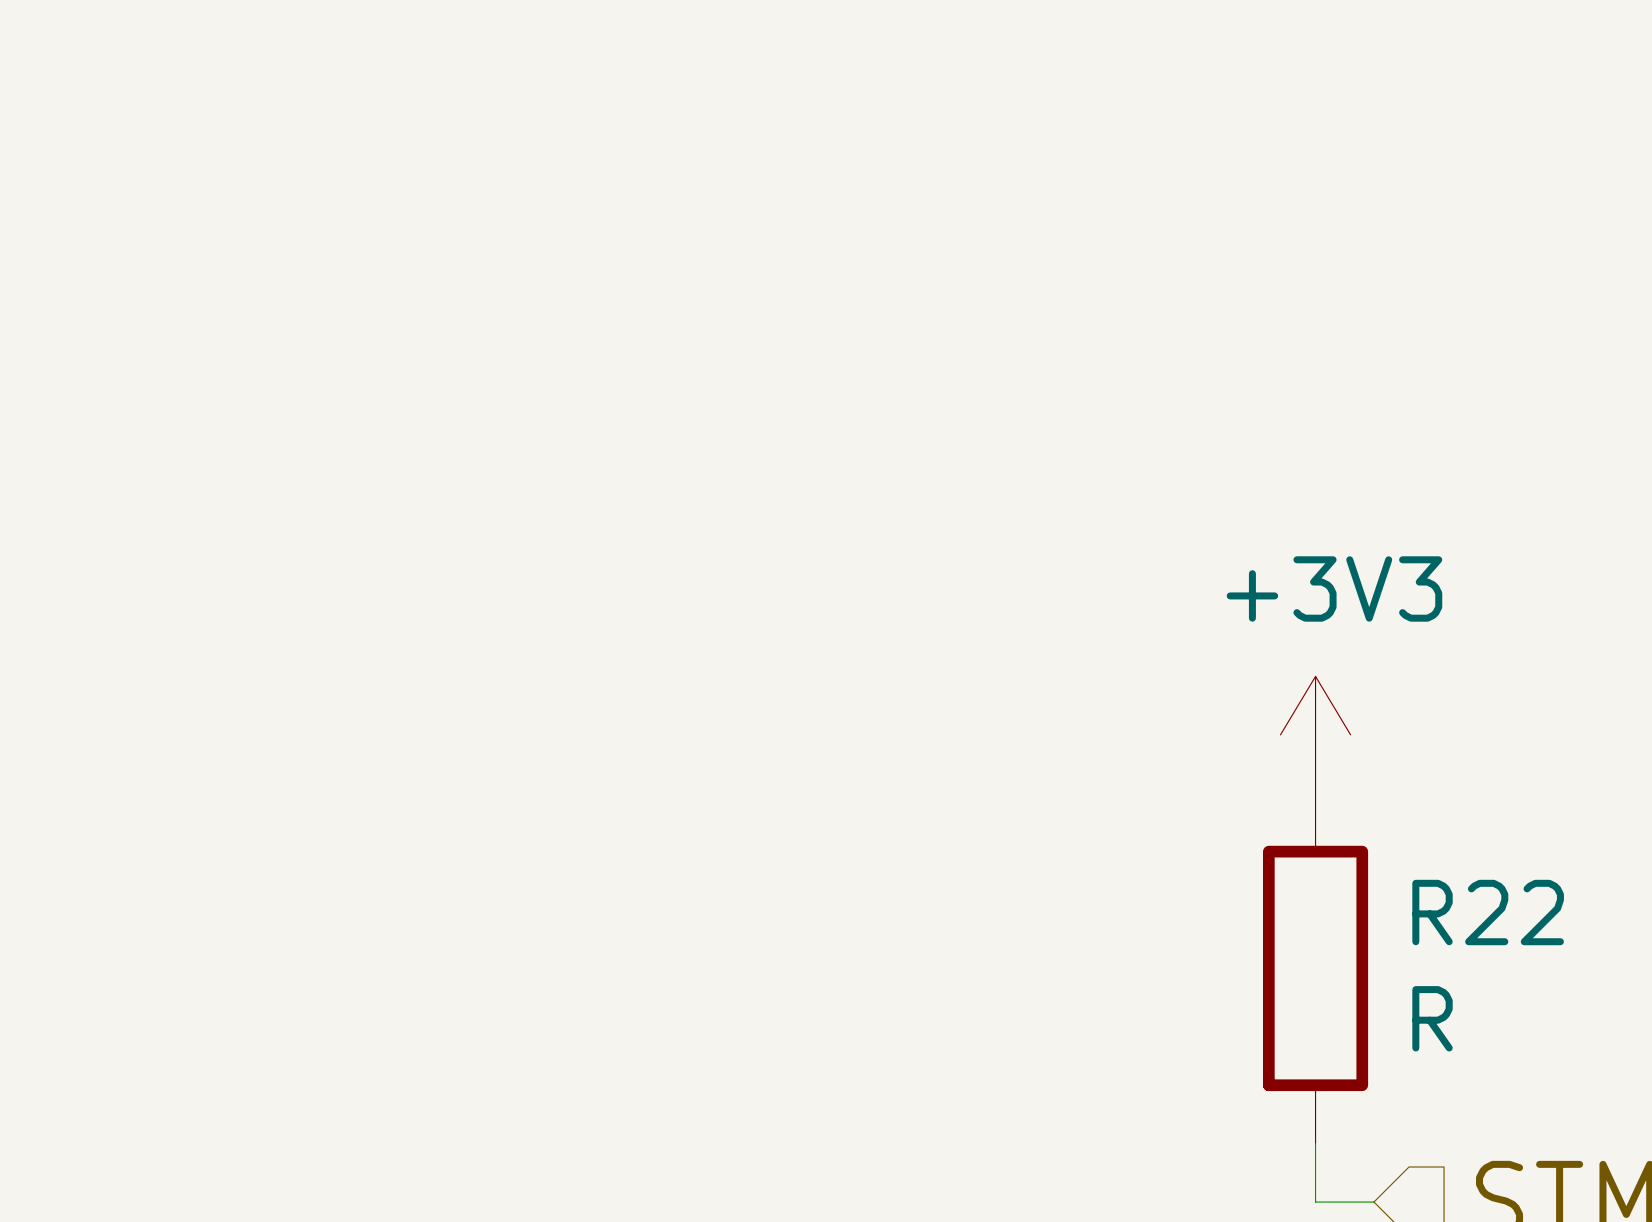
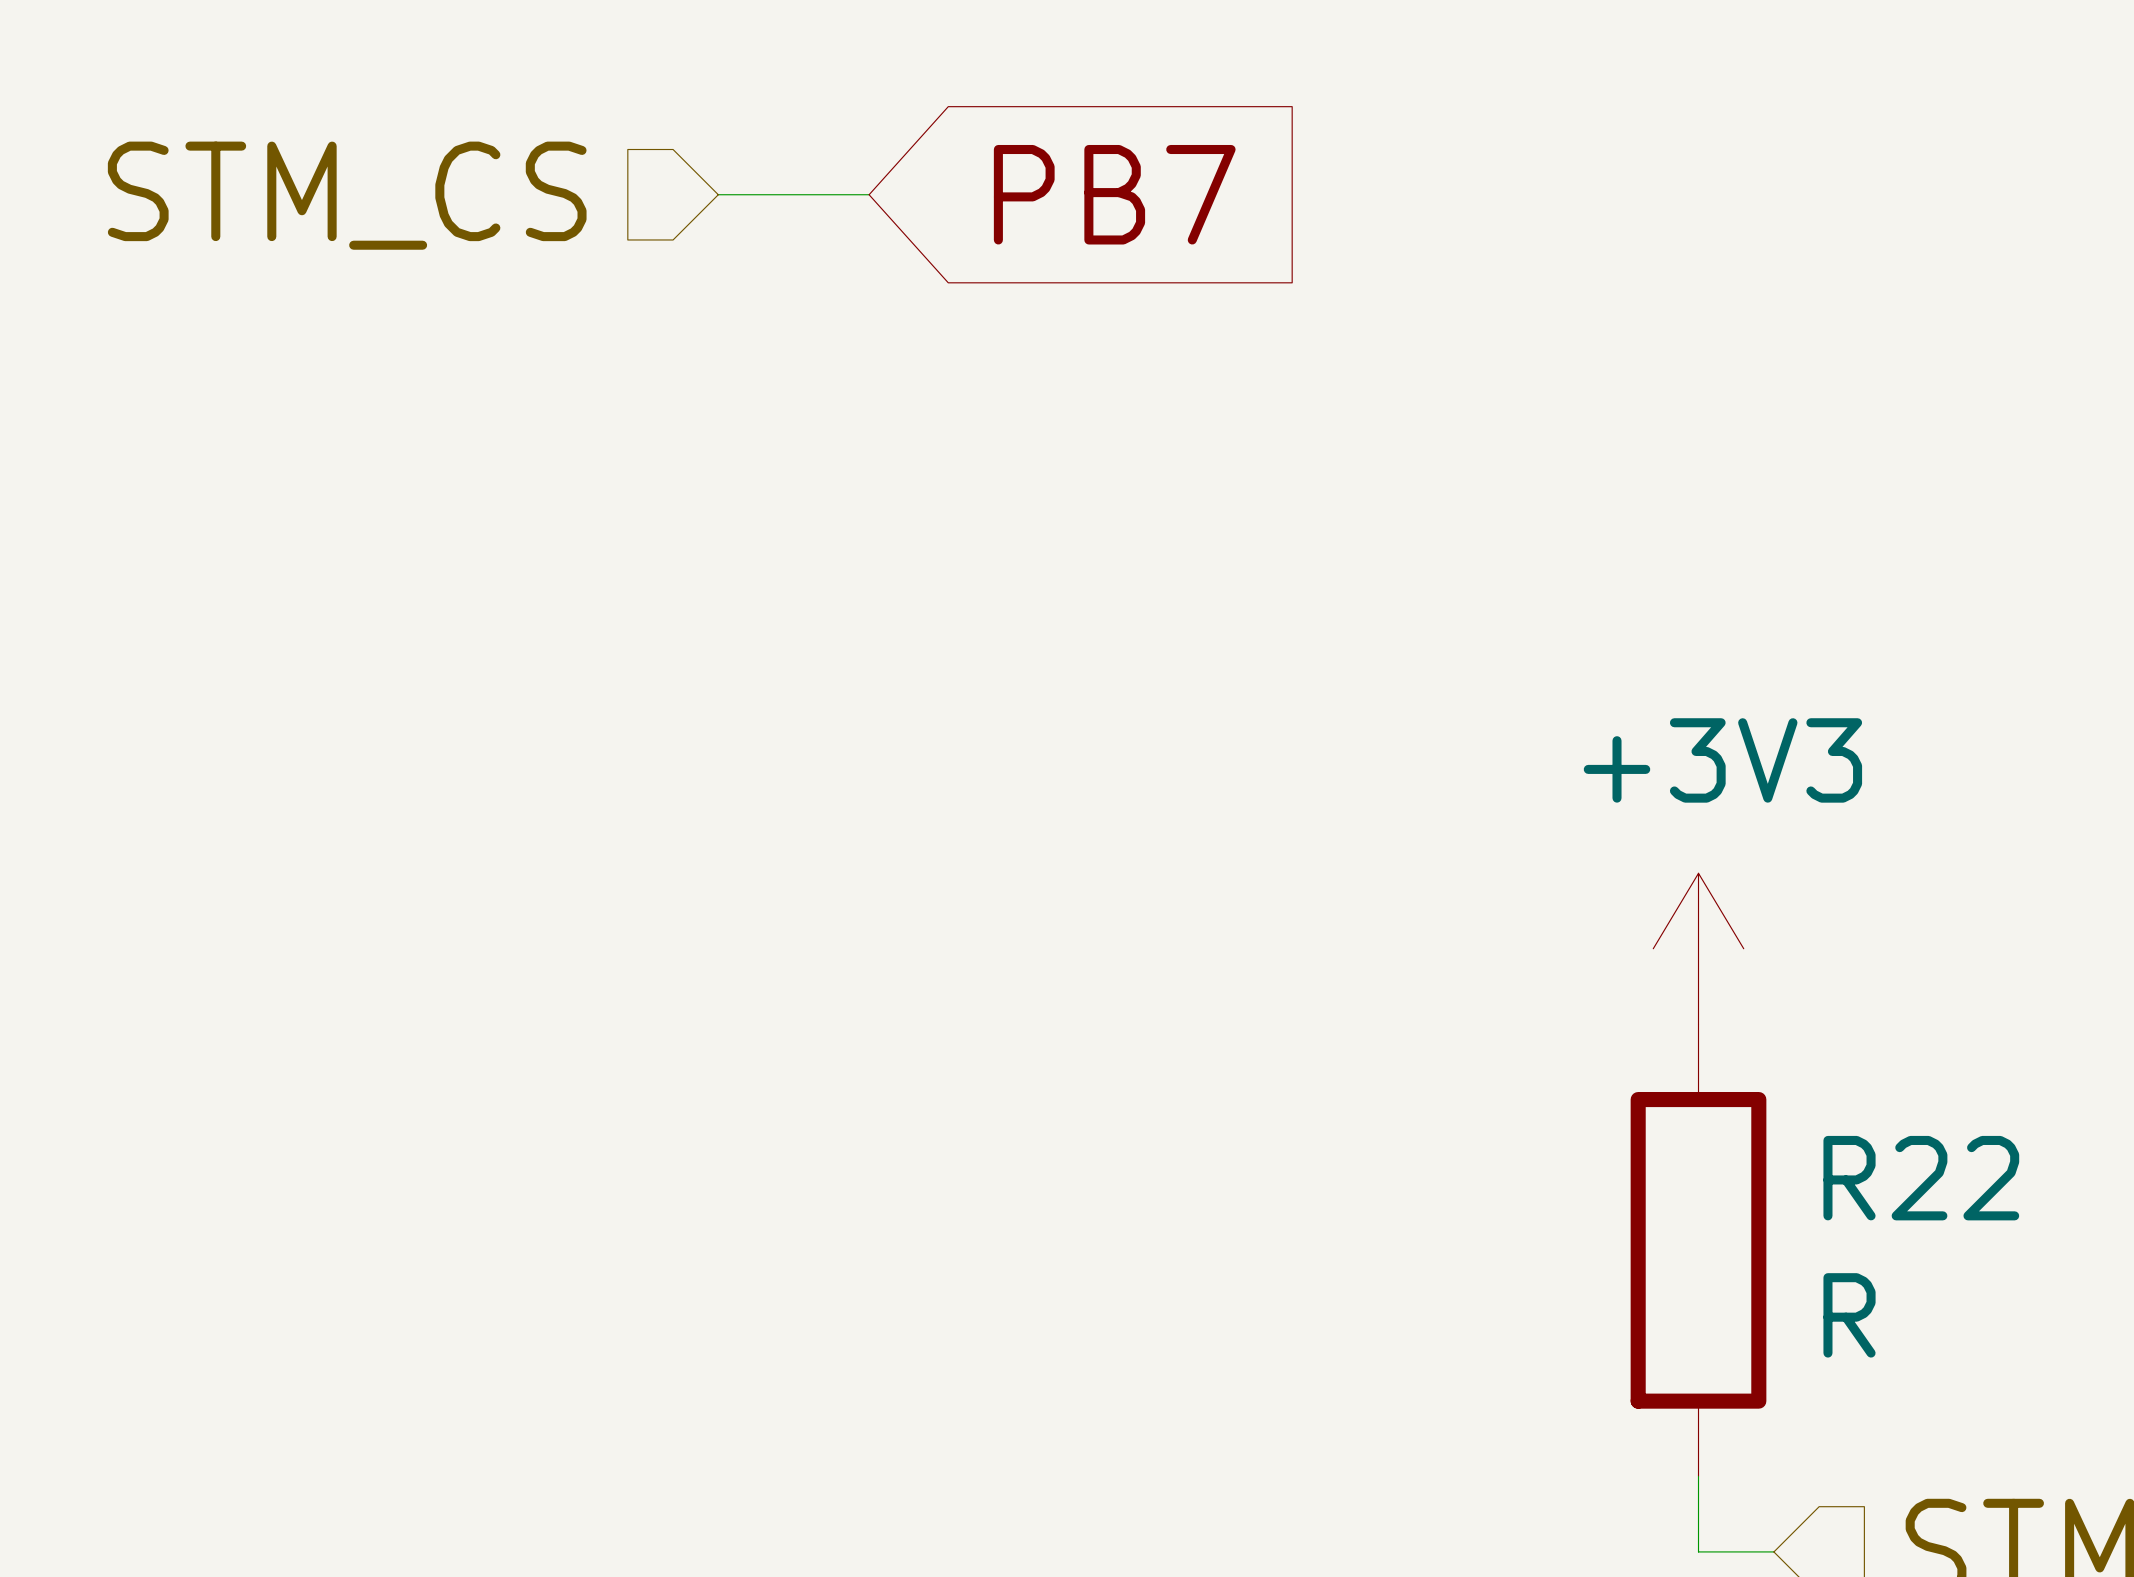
wire: none -> (718, 194) (869, 194)
global label: none -> PB7 (1114, 194)
hierarchical label: none -> STM_CS (347, 195)

